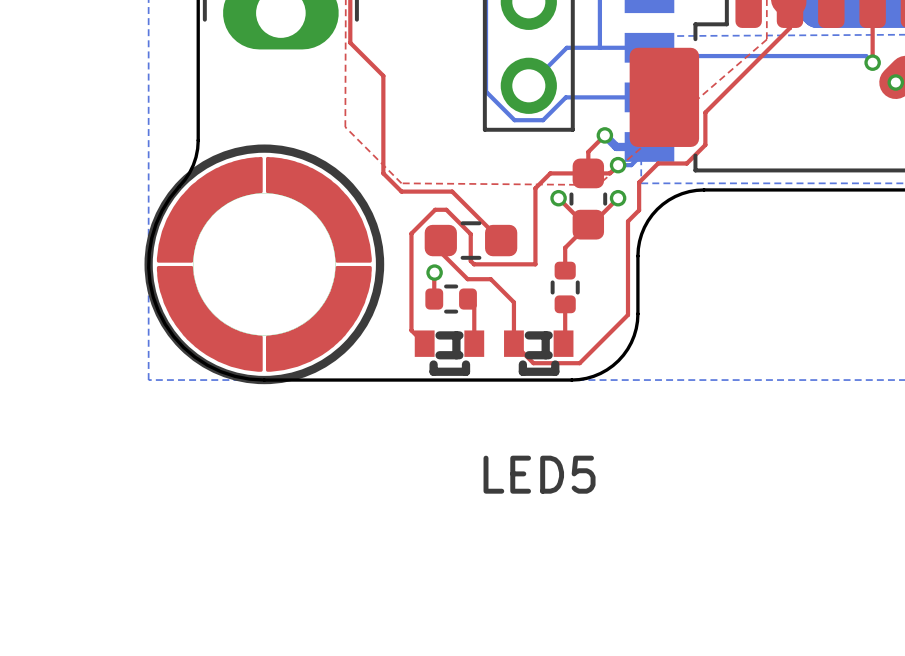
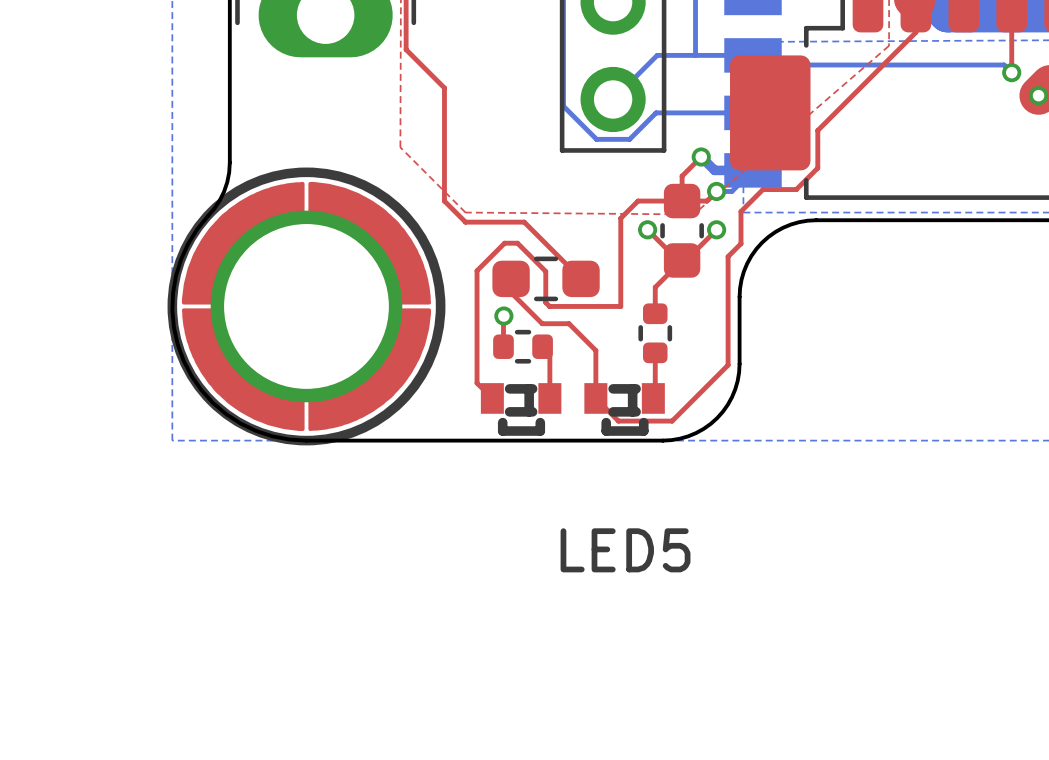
part footprint: [144, 144, 385, 385] -> [167, 167, 446, 446]

